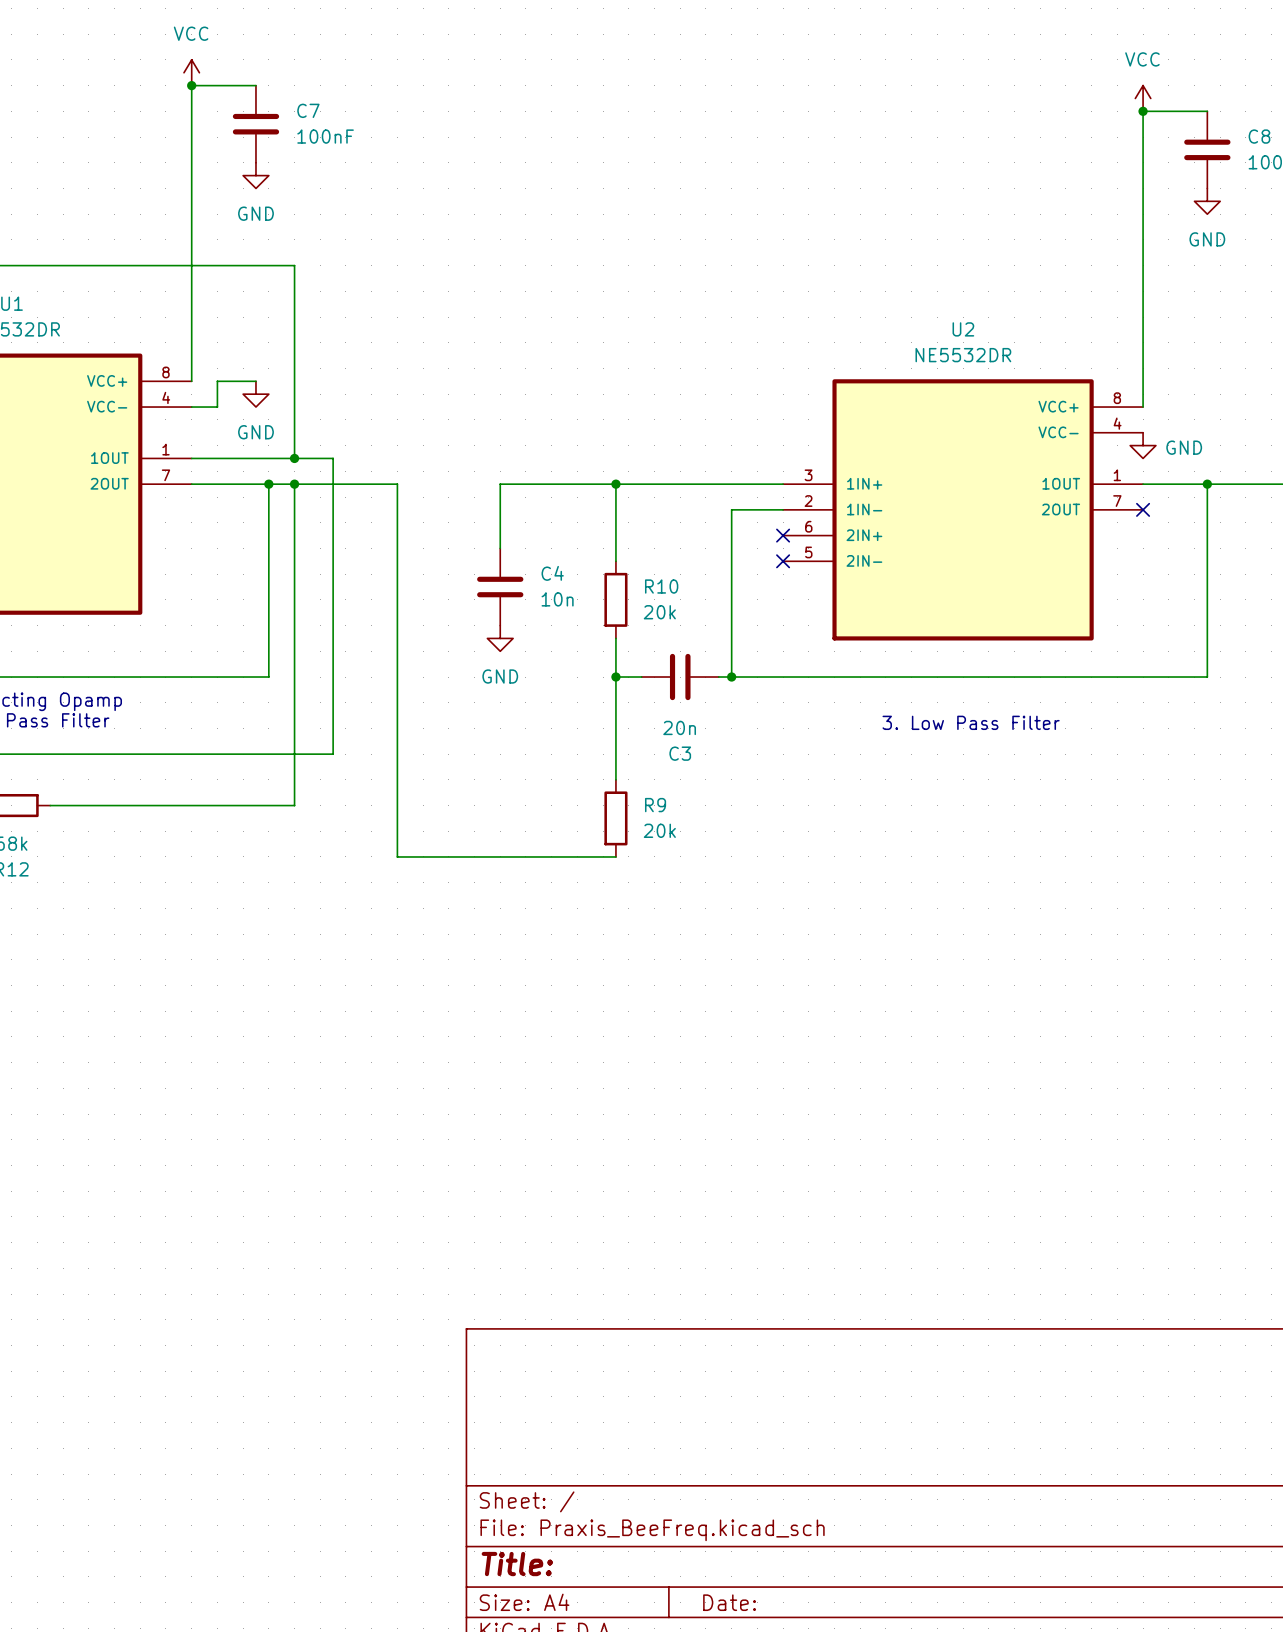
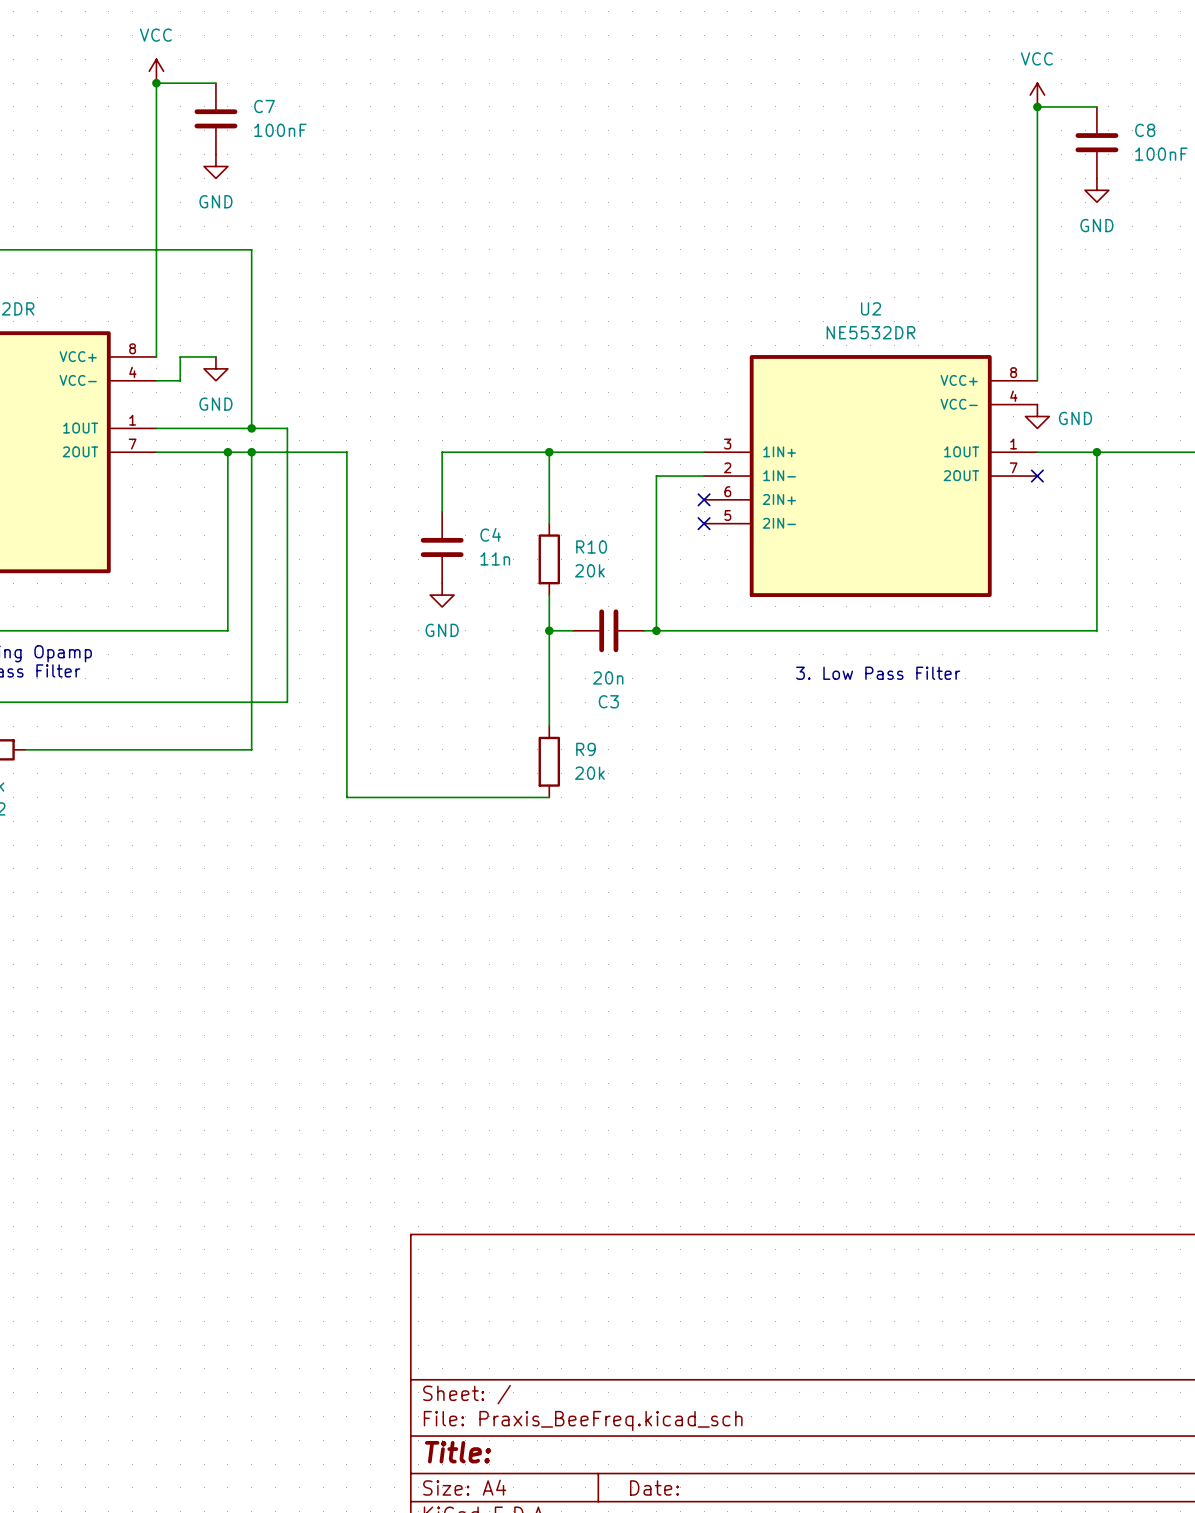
C4 value: 10n (557, 599) -> 11n (495, 558)

